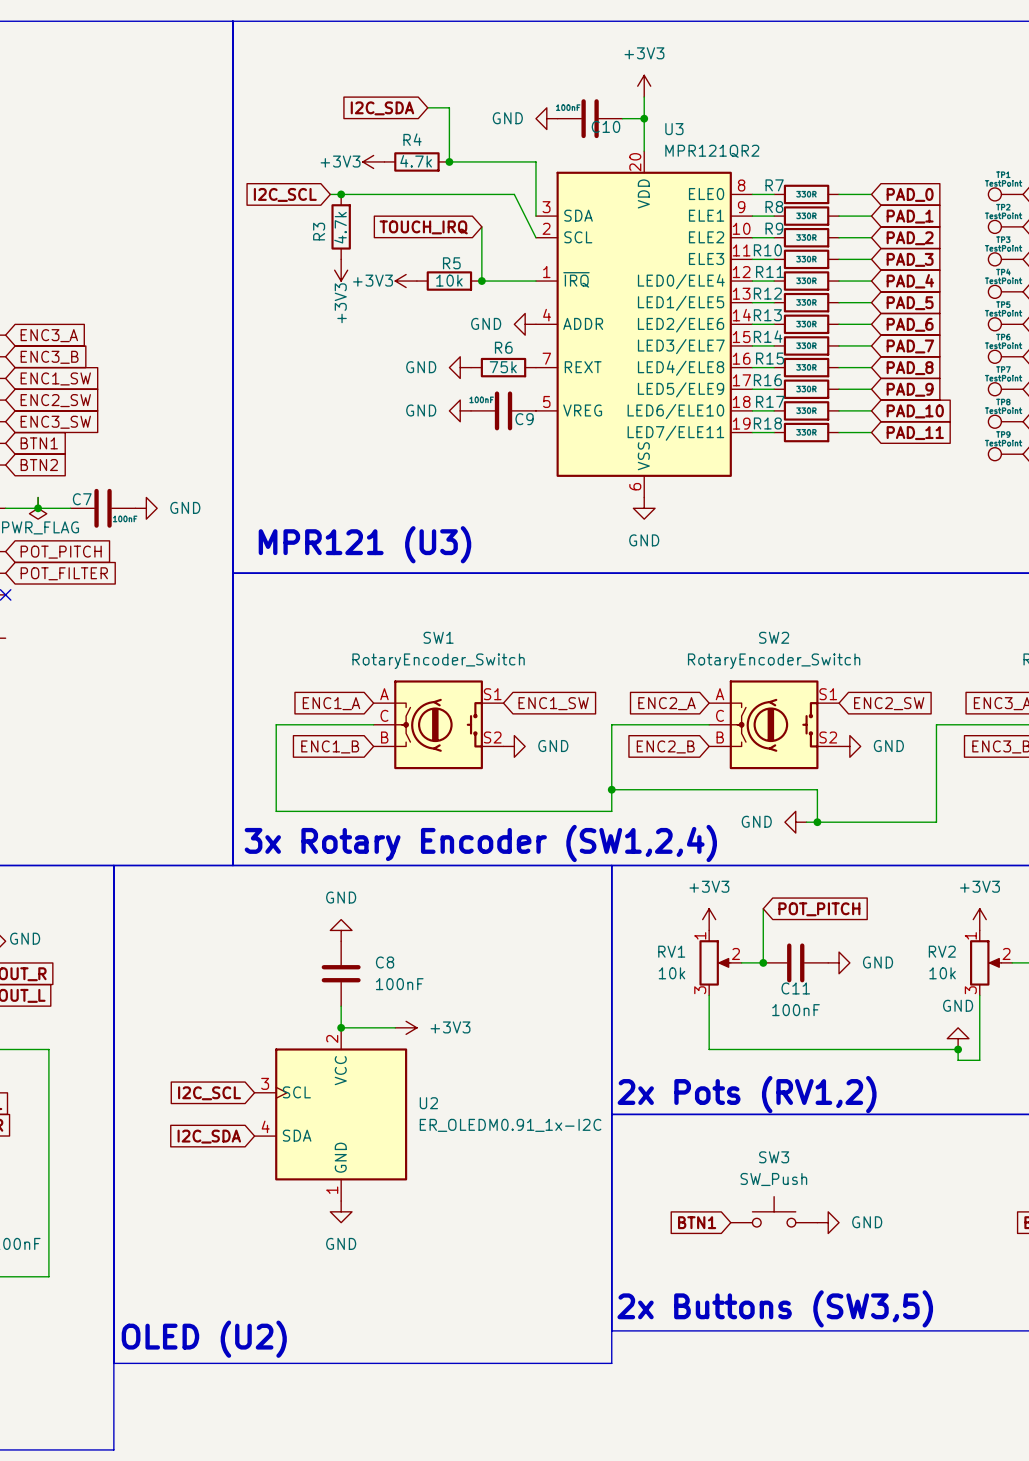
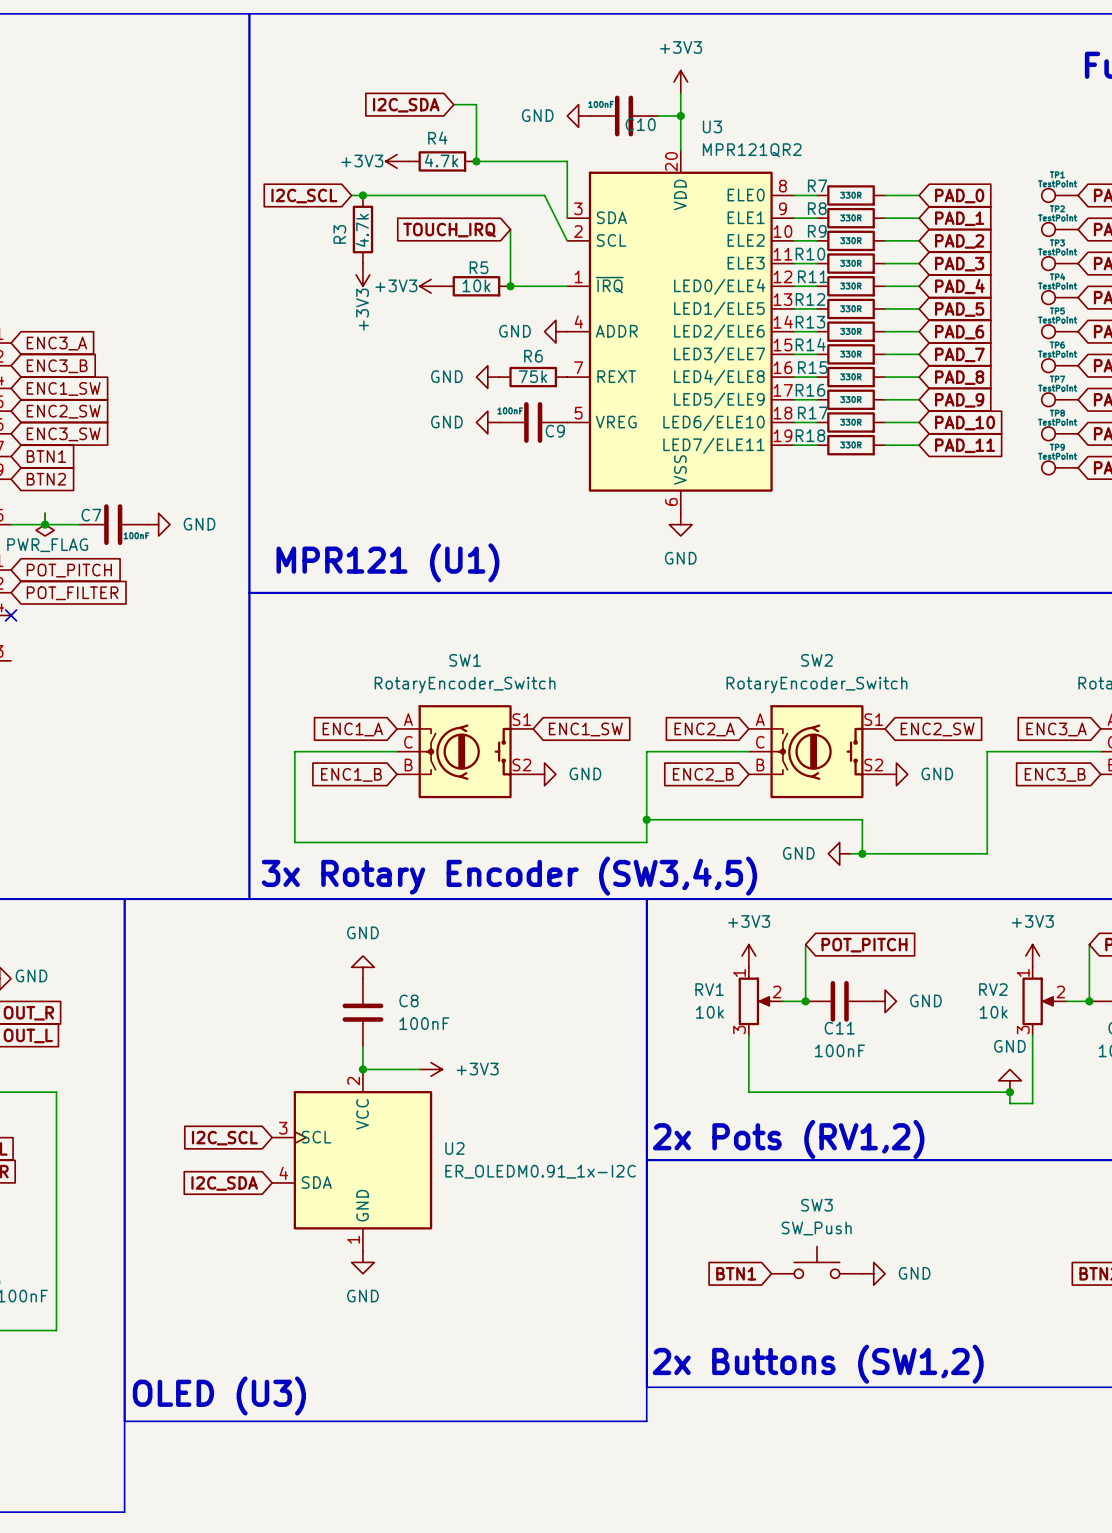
text: MPR121 (U3) (364, 544) -> MPR121 (U1) (387, 562)
text: 3x Rotary Encoder (SW1,2,4) (480, 843) -> 3x Rotary Encoder (SW3,4,5) (509, 876)
text: 2x Buttons (SW3,5) (775, 1308) -> 2x Buttons (SW1,2) (818, 1364)
text: OLED (U2) (204, 1339) -> OLED (U3) (219, 1395)

